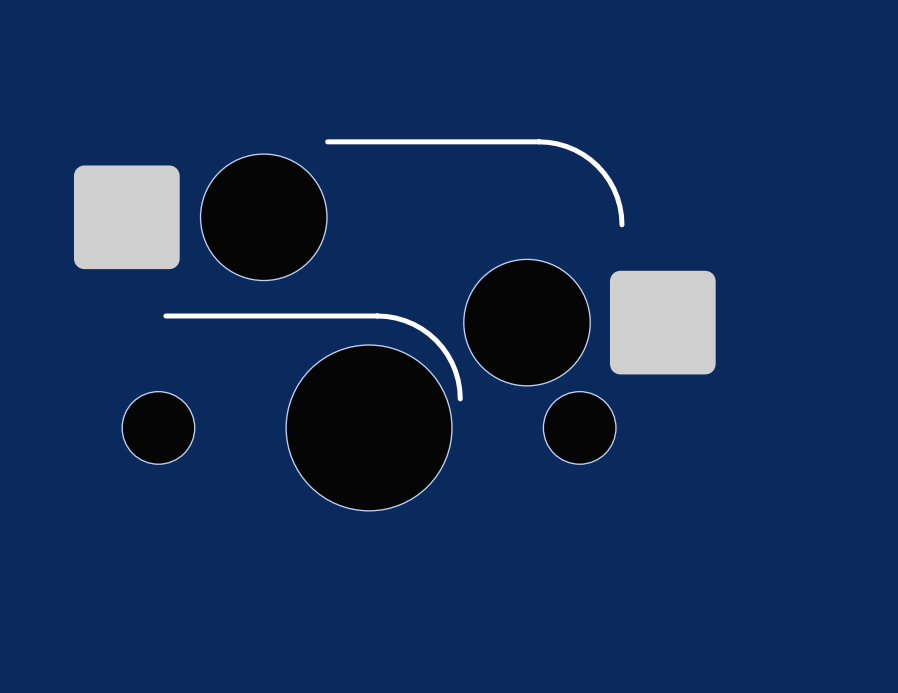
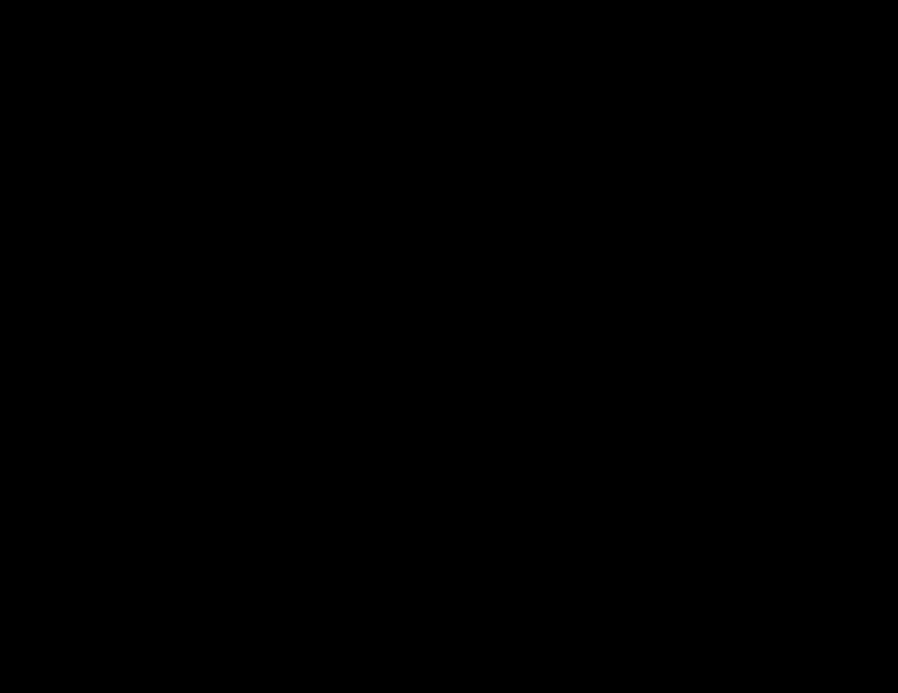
part: (394, 325) -> none

